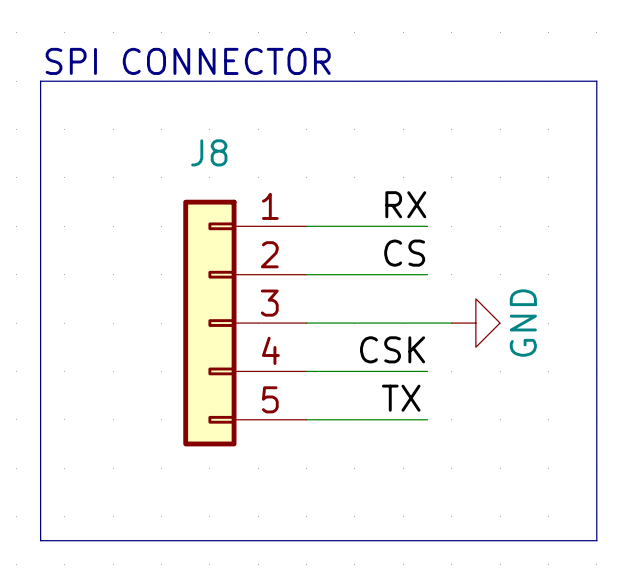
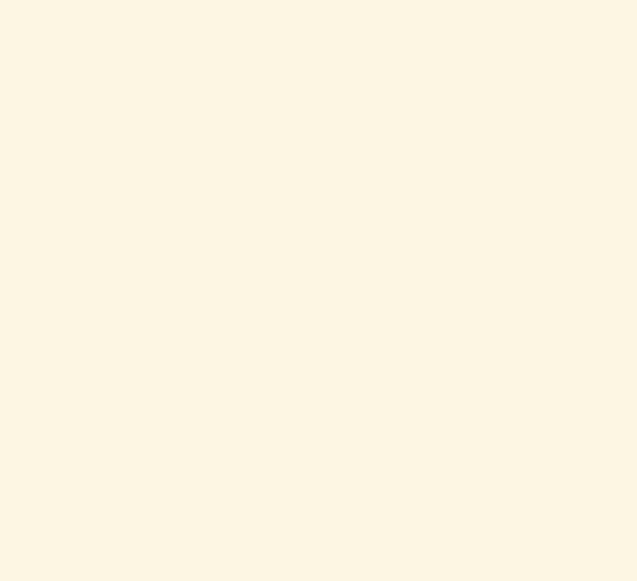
text: SPI CONNECTOR (188, 61) -> none
line: (40, 81) (596, 81) (596, 540) (40, 540) (40, 81) -> none
label: RX (405, 204) -> none
wire: (306, 226) (427, 226) -> none
label: CS (404, 253) -> none
wire: (306, 274) (427, 274) -> none
J8: (244, 323) -> none
wire: (306, 323) (451, 323) -> none
power symbol: GND (475, 323) -> none
label: CSK (392, 349) -> none
wire: (306, 371) (427, 371) -> none
label: TX (401, 398) -> none
wire: (306, 419) (427, 419) -> none

